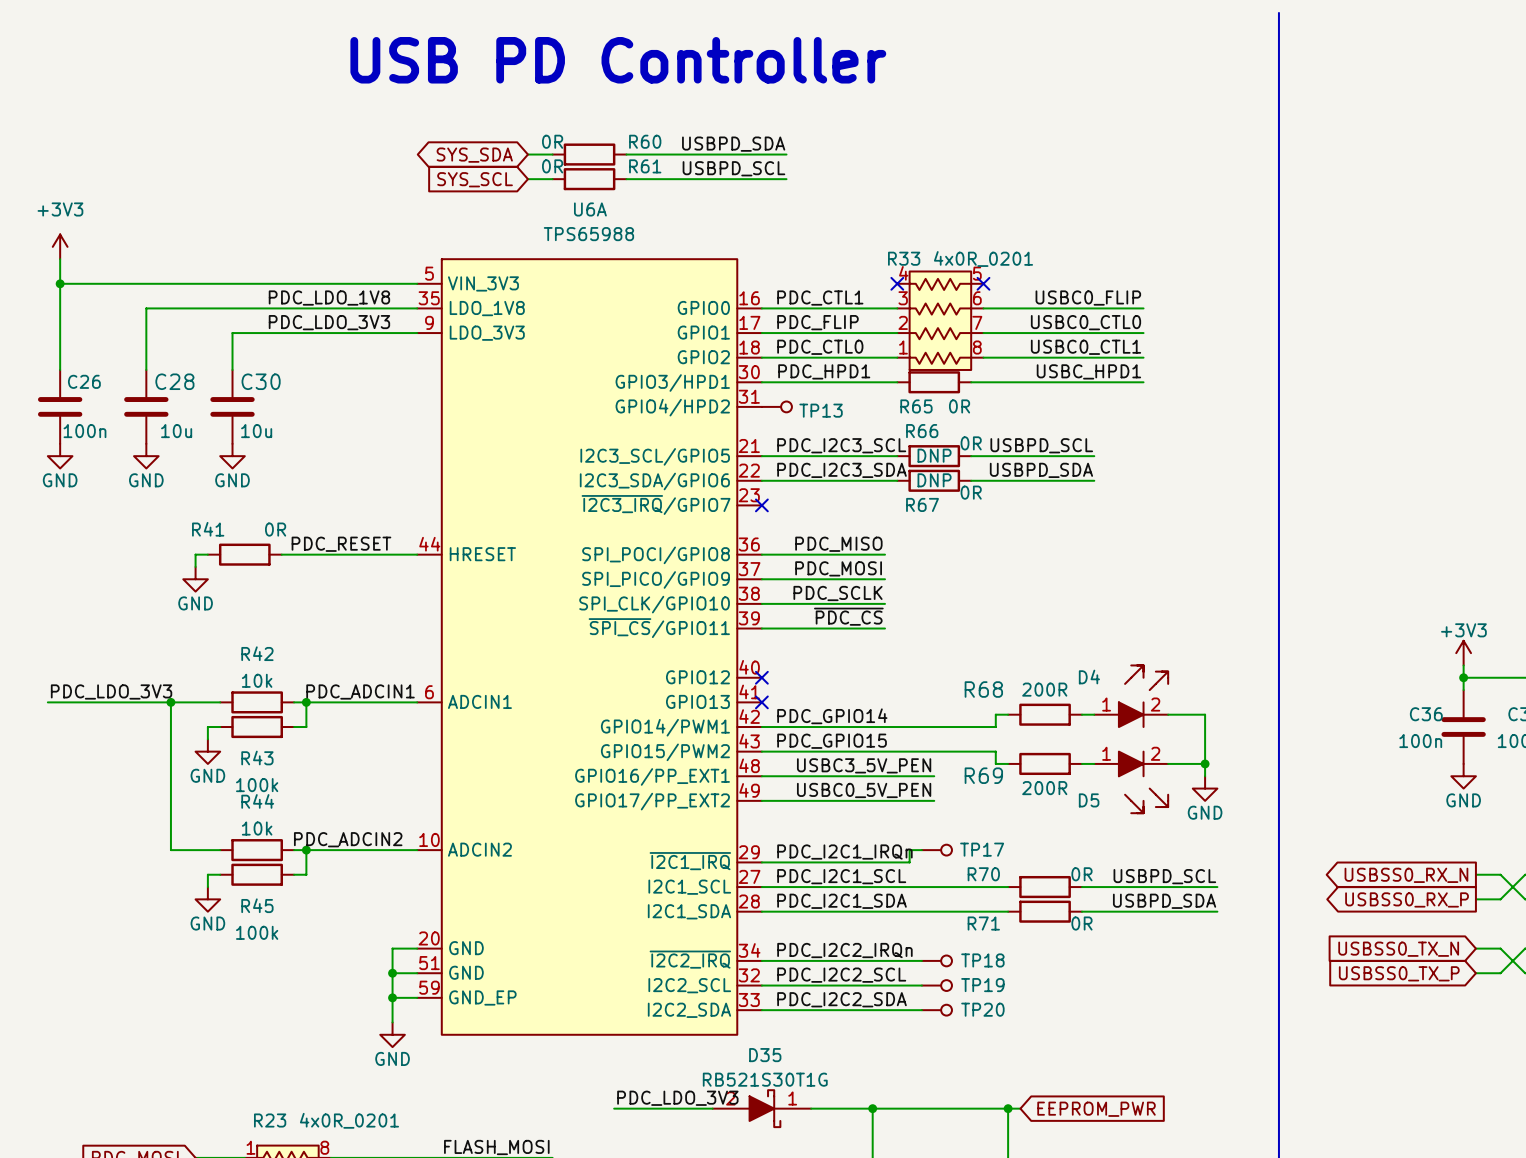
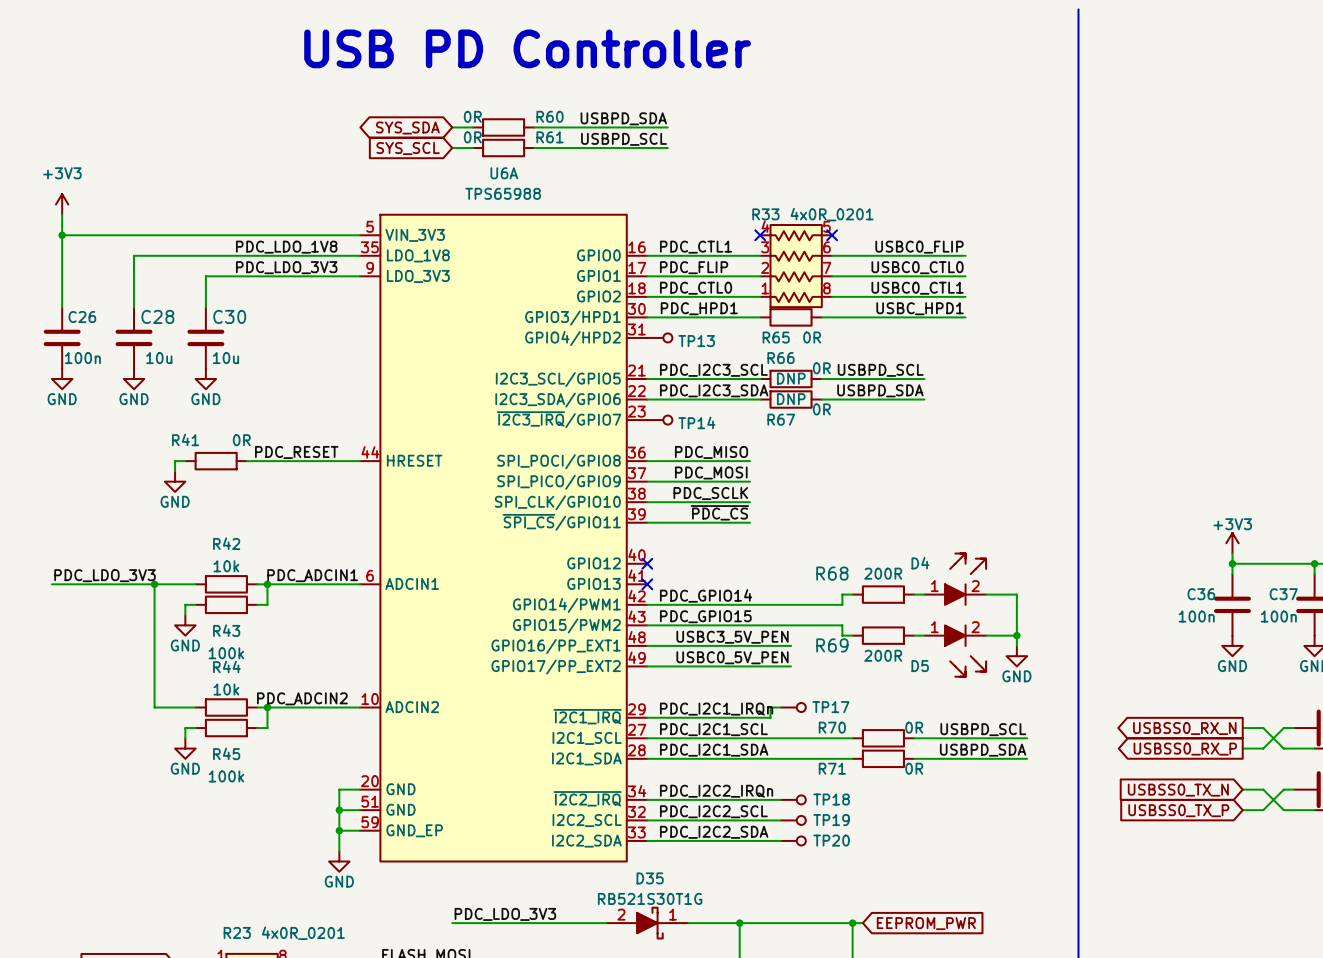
no-connect mark: (761, 505) -> none
TP14: none -> (659, 420)
label position: PDC_LDO_3V3 (677, 1098) -> PDC_LDO_3V3 (505, 914)
wire: none -> (452, 923) (524, 923)

